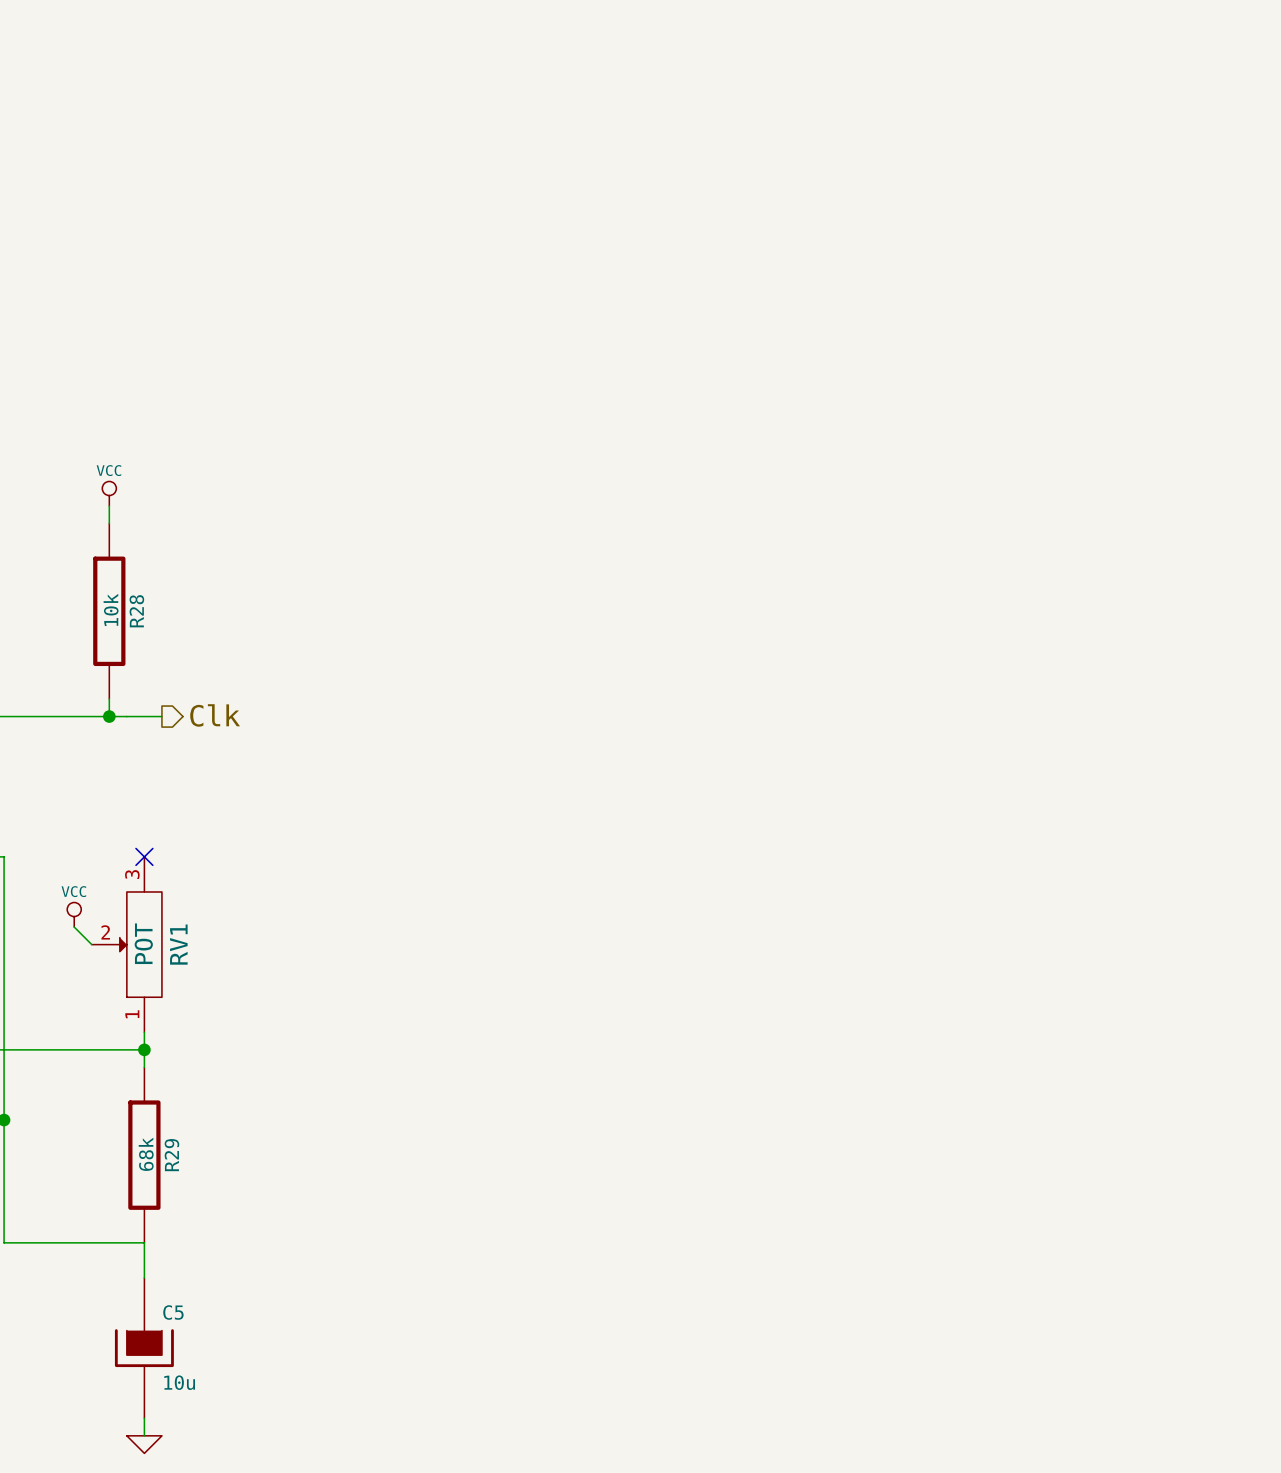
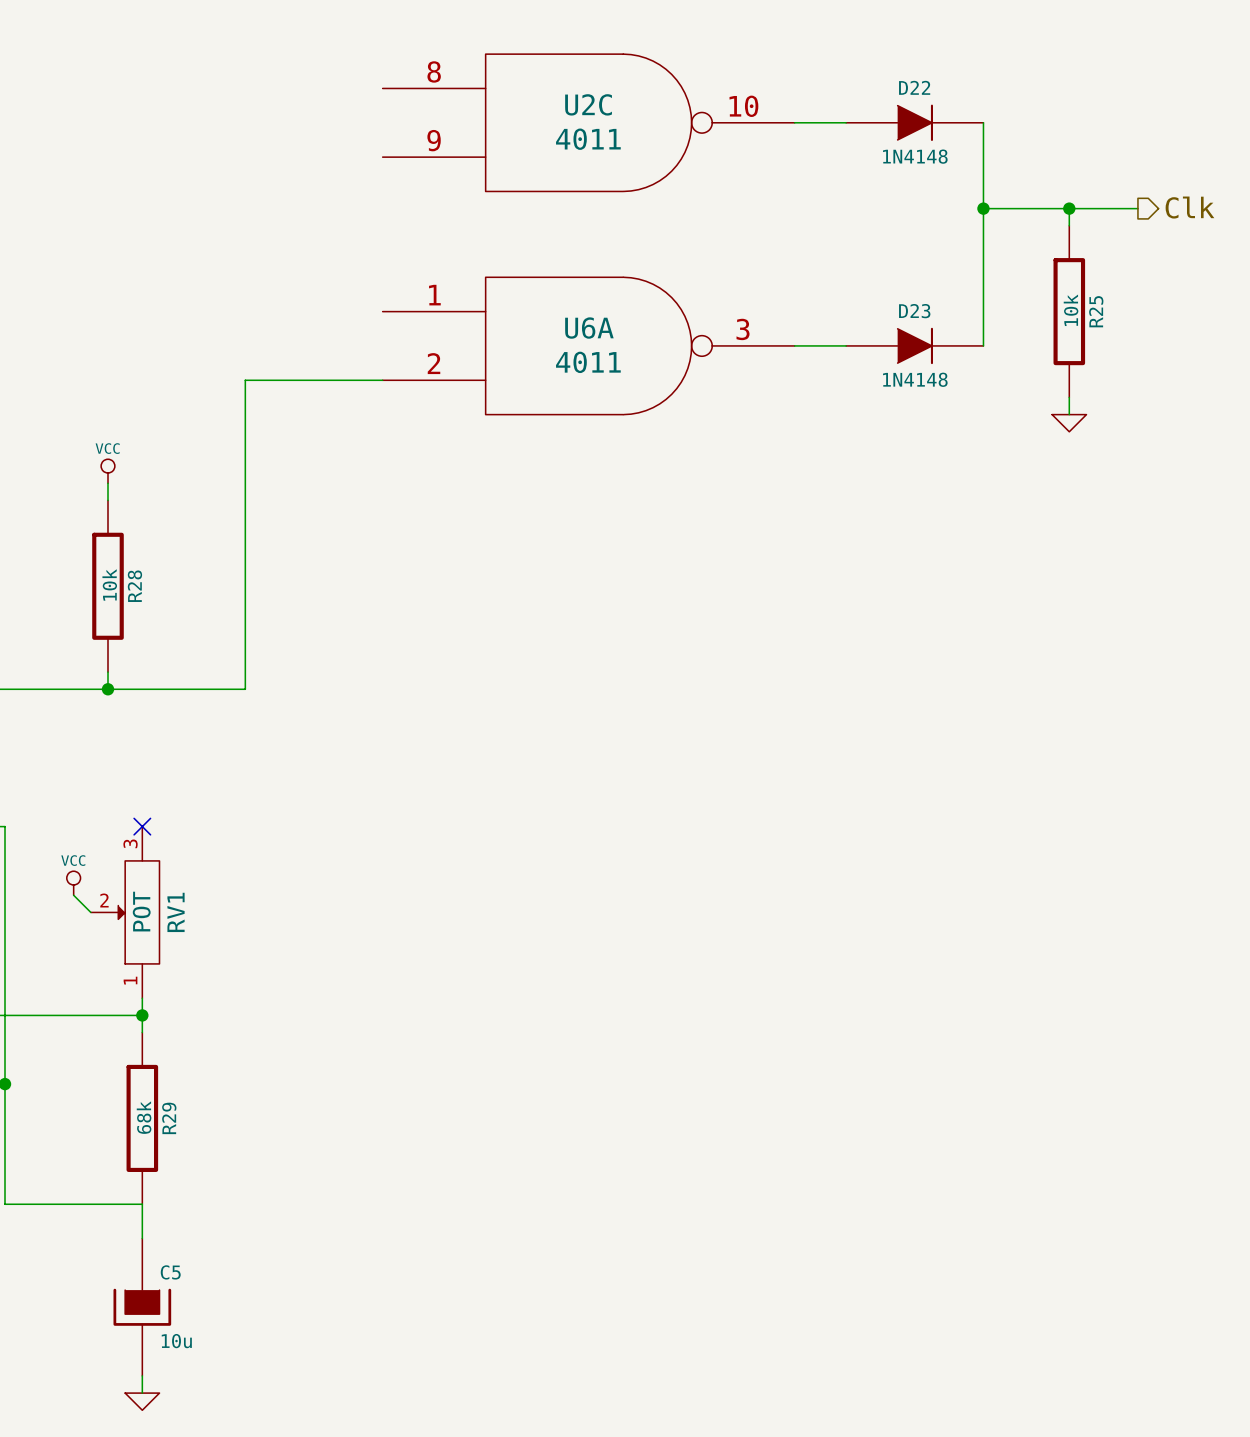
U2C: none -> 4011 (588, 122)
wire: none -> (794, 122) (846, 122)
D22: none -> 1N4148 (914, 122)
wire: none -> (983, 122) (983, 345)
hierarchical label: none -> Clk (1189, 207)
wire: none -> (983, 208) (1137, 208)
junction: none -> (983, 208)
wire: none -> (1069, 208) (1069, 225)
junction: none -> (1069, 208)
R25: none -> 10k (1069, 311)
U6A: none -> 4011 (588, 345)
wire: none -> (794, 345) (846, 345)
D23: none -> 1N4148 (914, 345)
wire: none -> (382, 380) (245, 380) (245, 689) (159, 689)
wire: none -> (1069, 397) (1069, 414)
power symbol: none -> (1069, 423)
hierarchical label: Clk (215, 715) -> none

